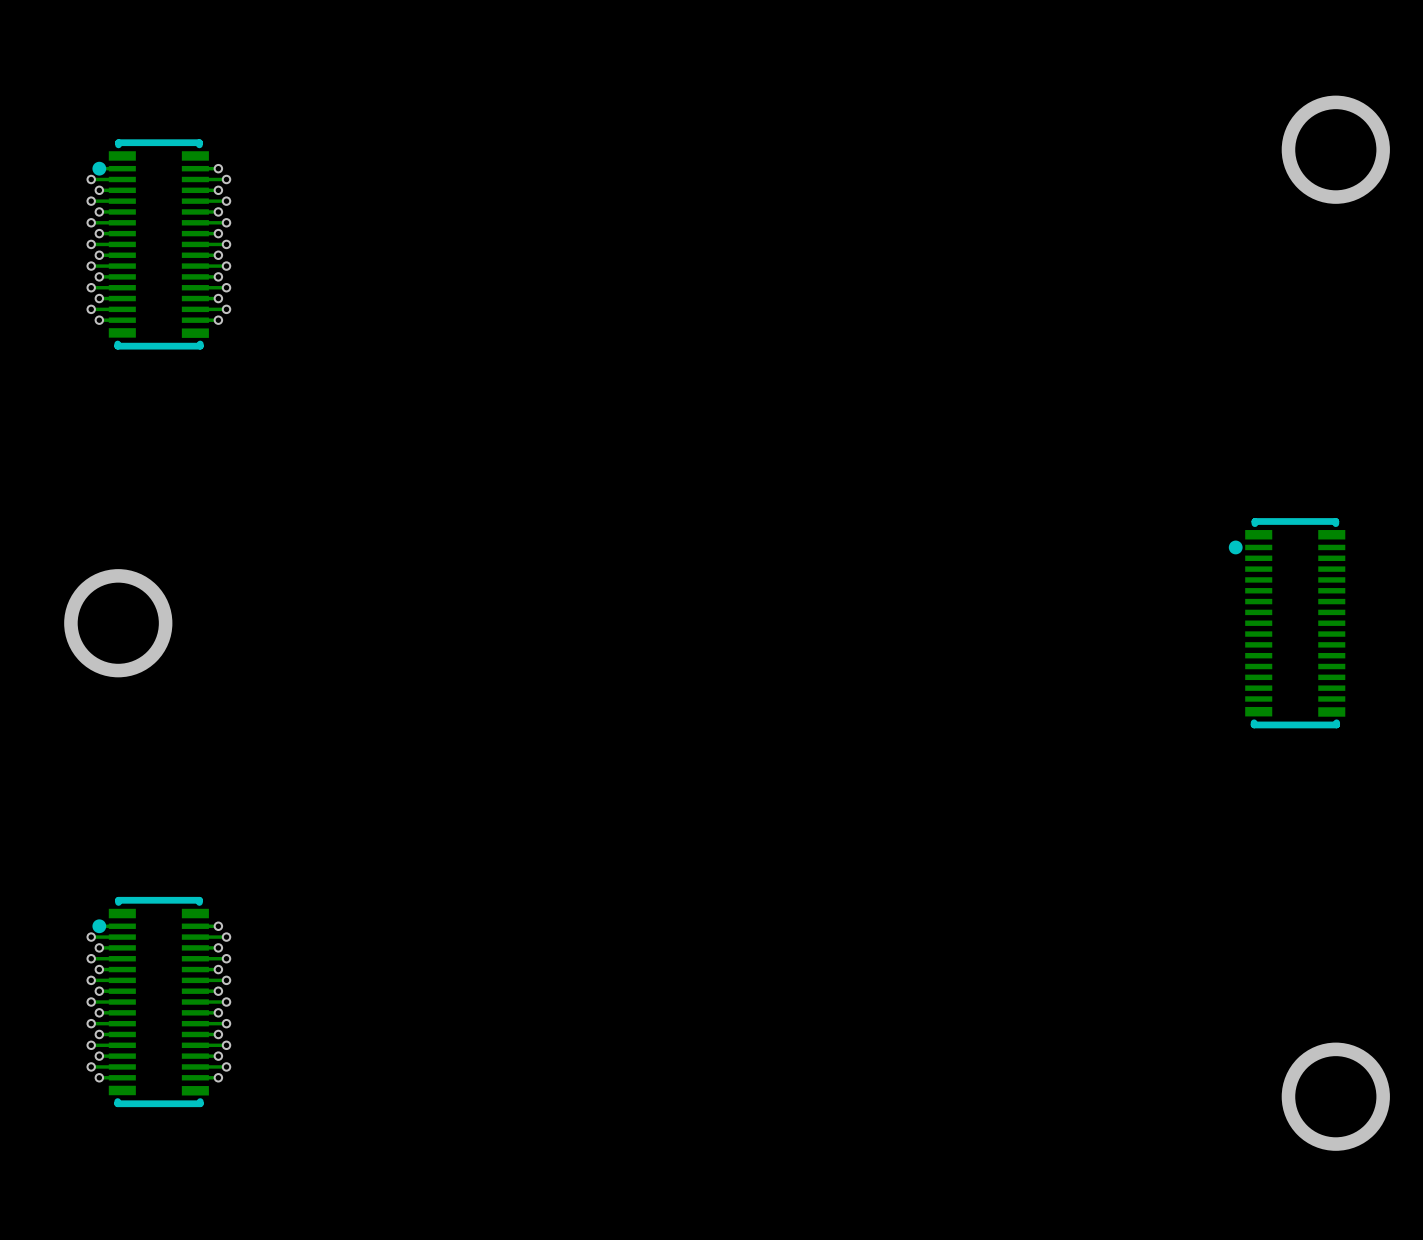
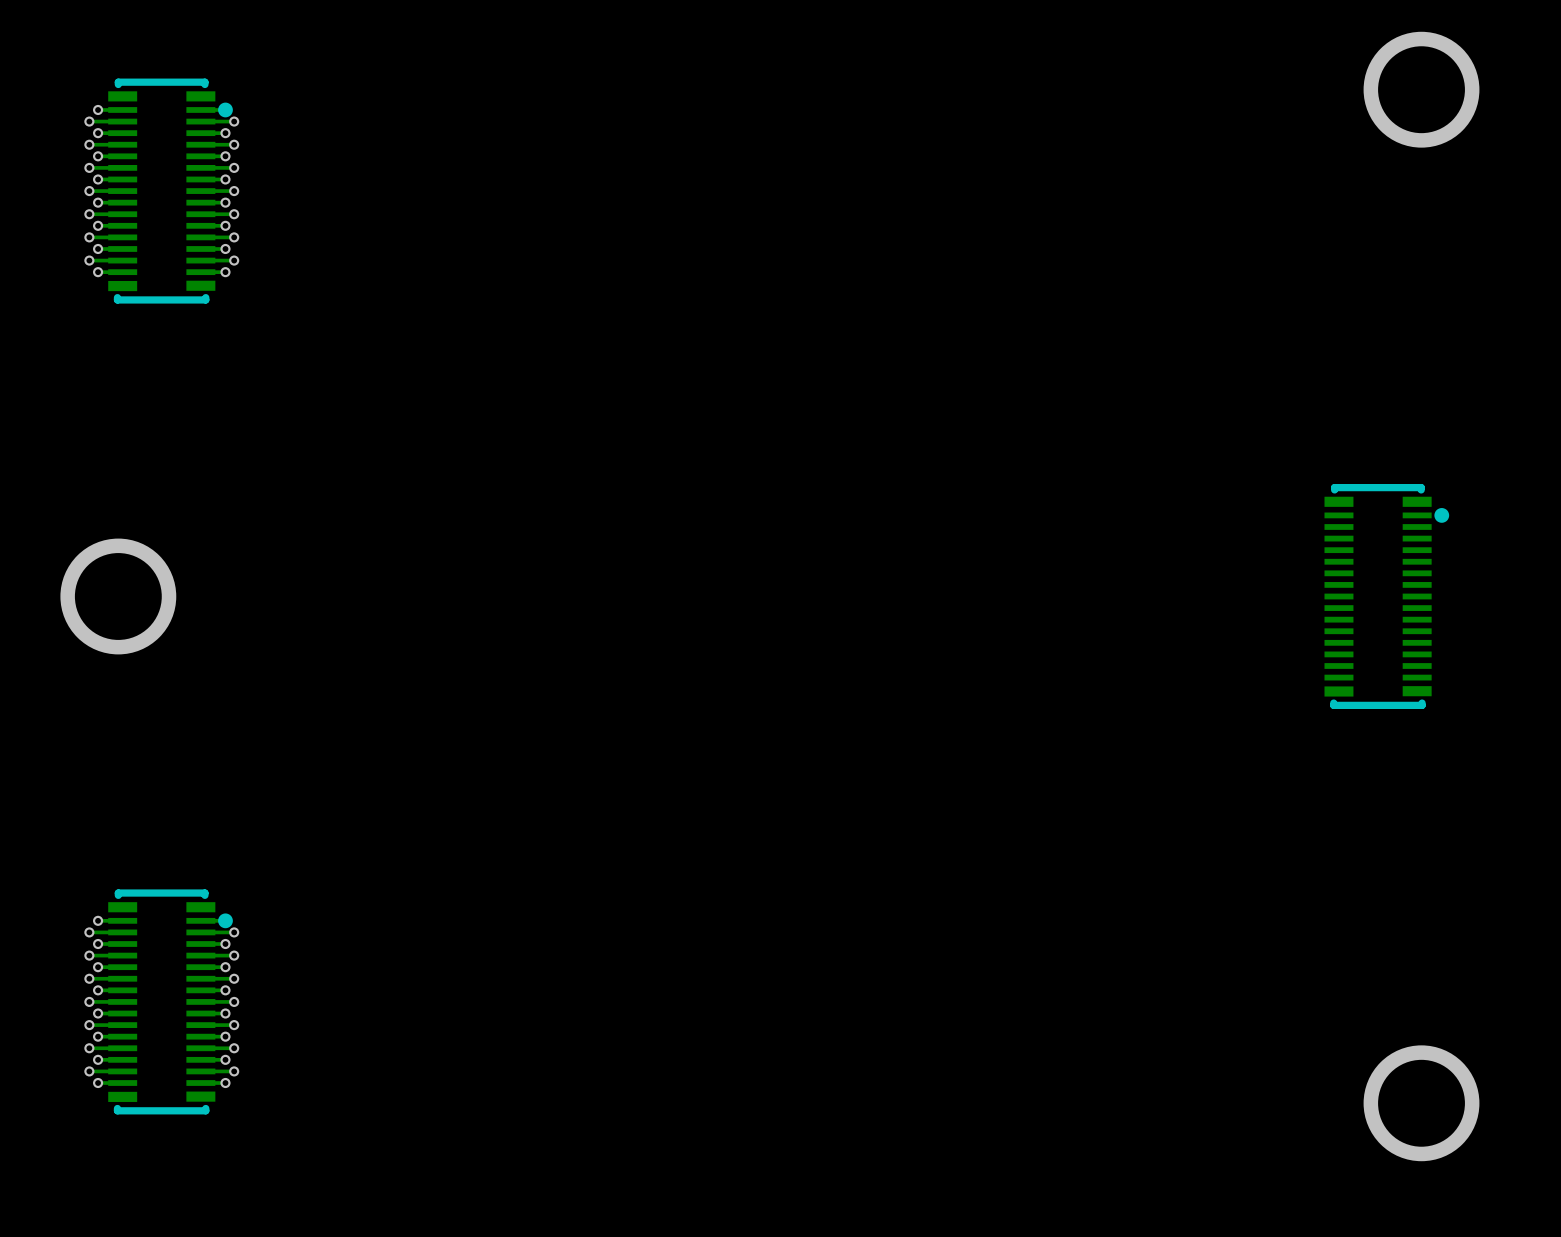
part footprint: [92, 139, 209, 350] -> [108, 78, 233, 304]
part footprint: [1228, 518, 1346, 729] -> [1324, 483, 1450, 710]
part footprint: [92, 896, 209, 1108] -> [108, 889, 233, 1115]

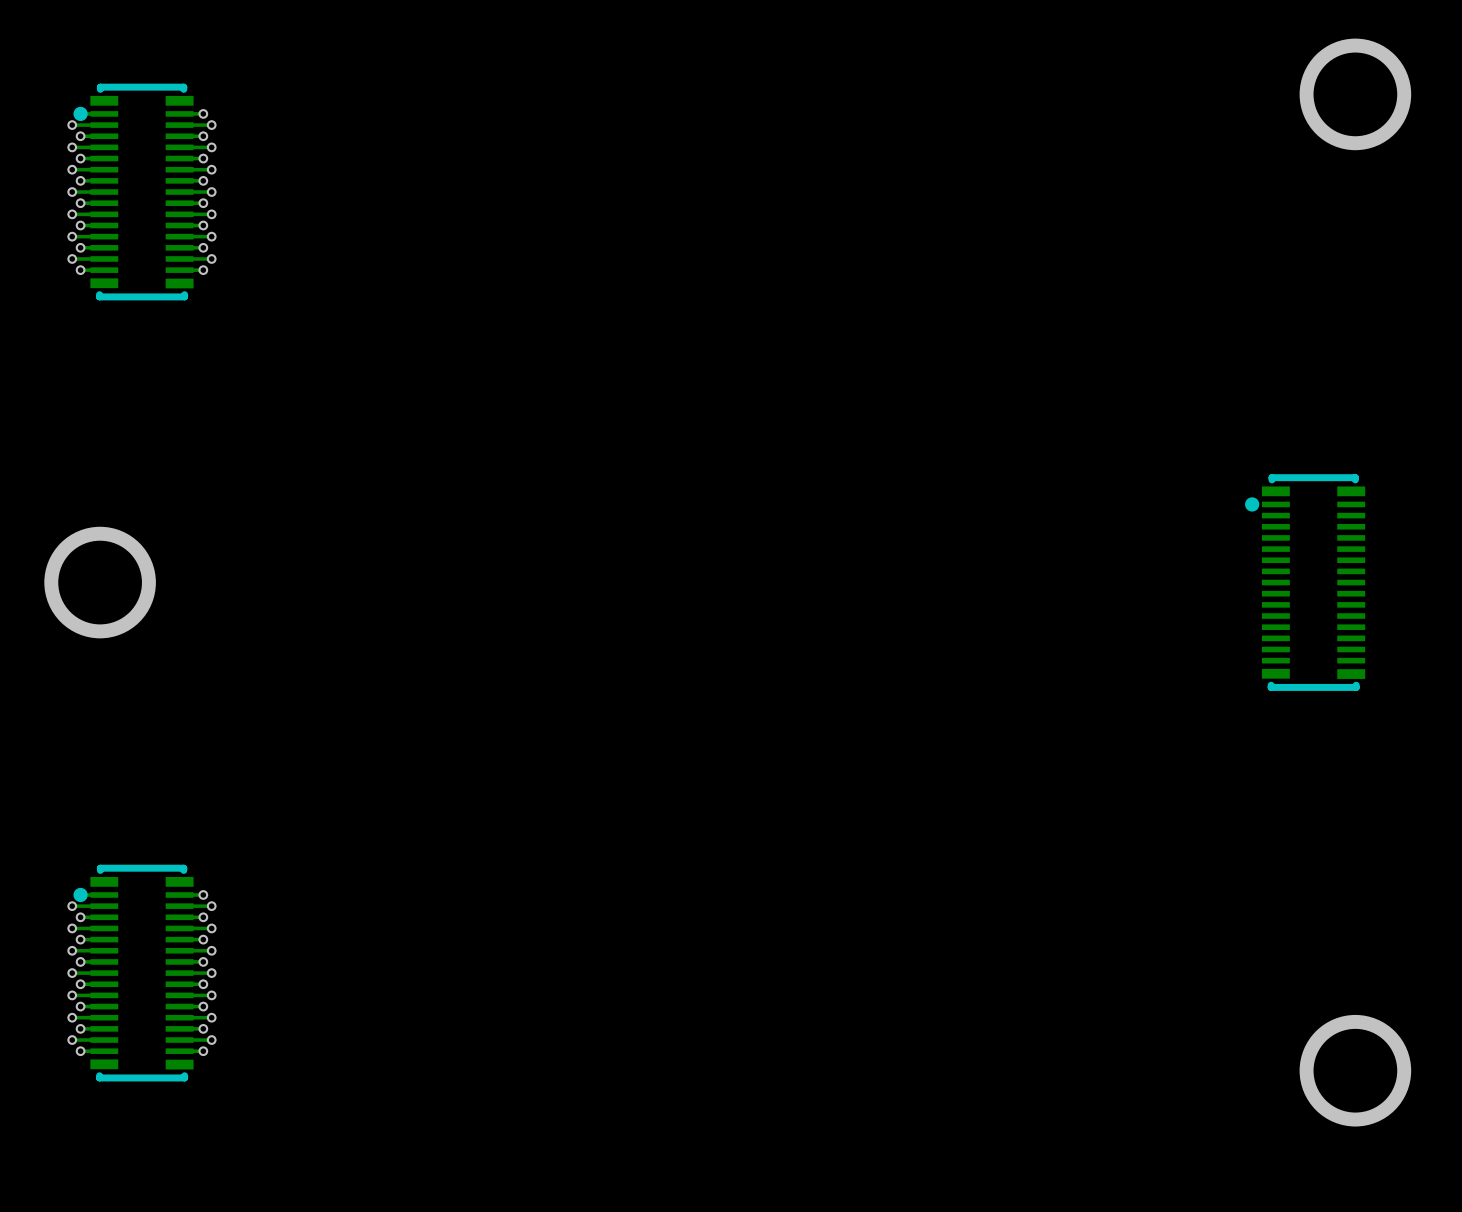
part footprint: [108, 78, 233, 304] -> [73, 83, 194, 301]
part footprint: [1324, 483, 1450, 710] -> [1245, 474, 1366, 691]
part footprint: [108, 889, 233, 1115] -> [73, 864, 194, 1082]

